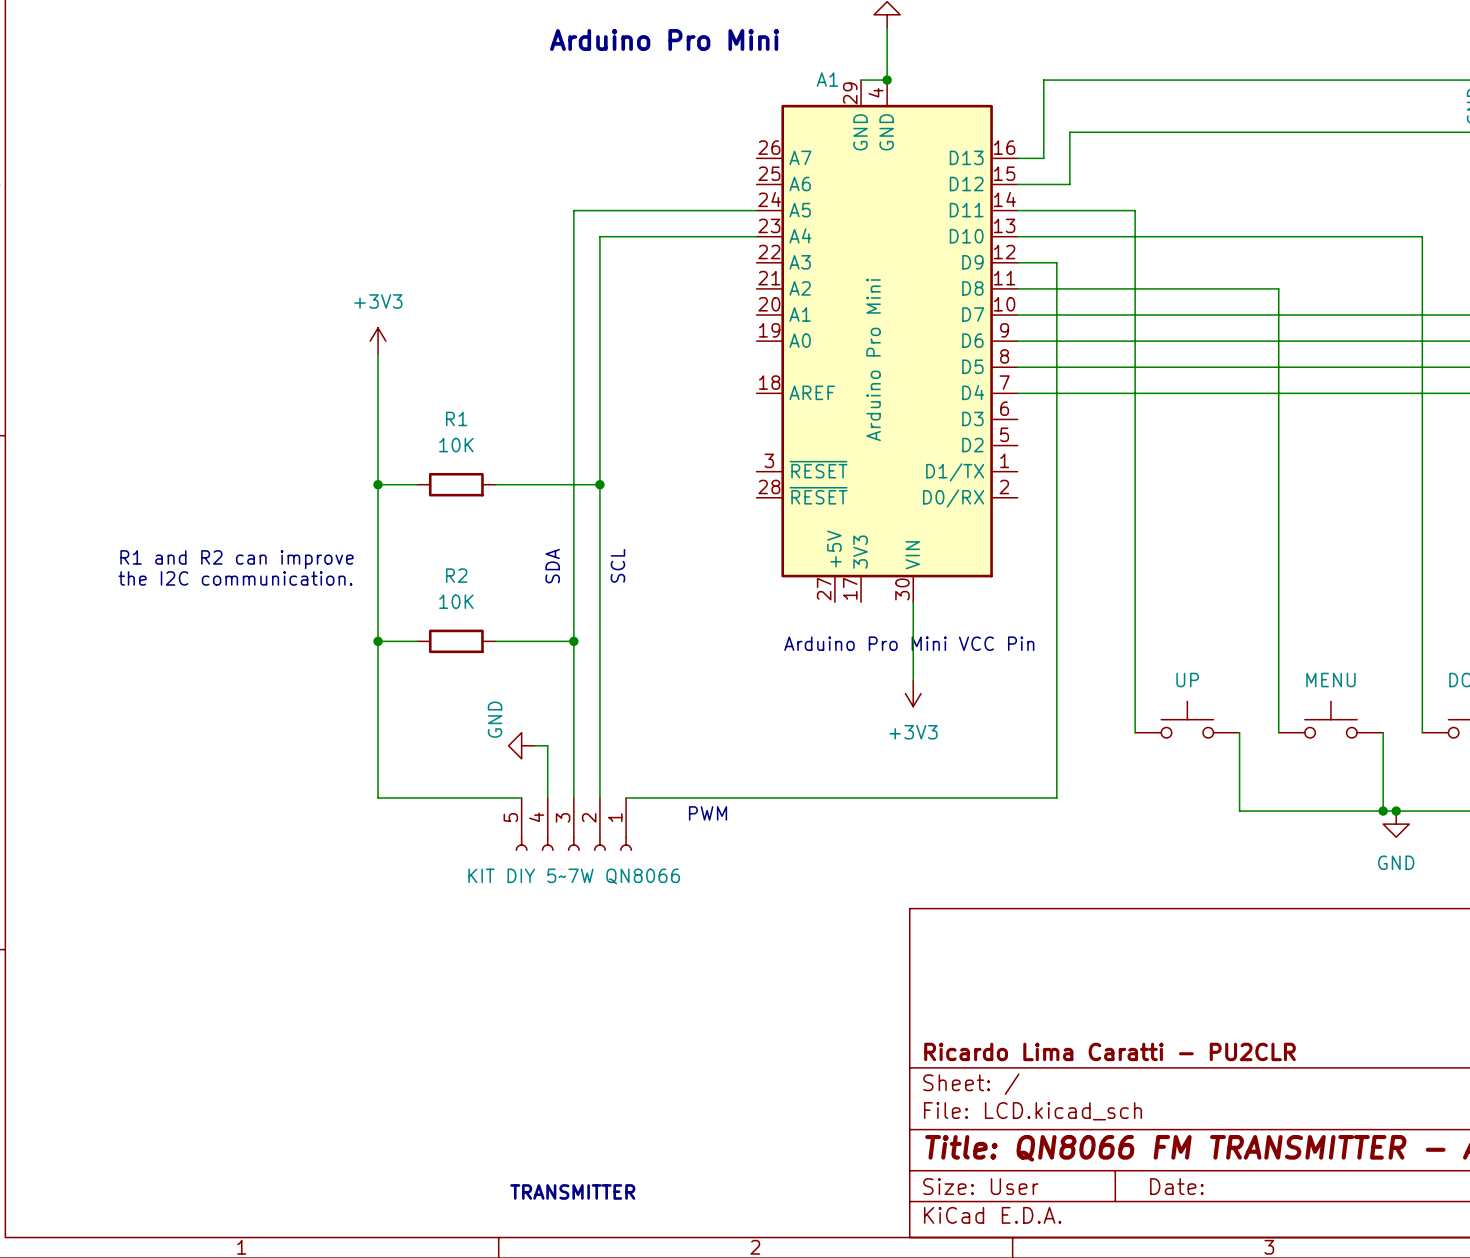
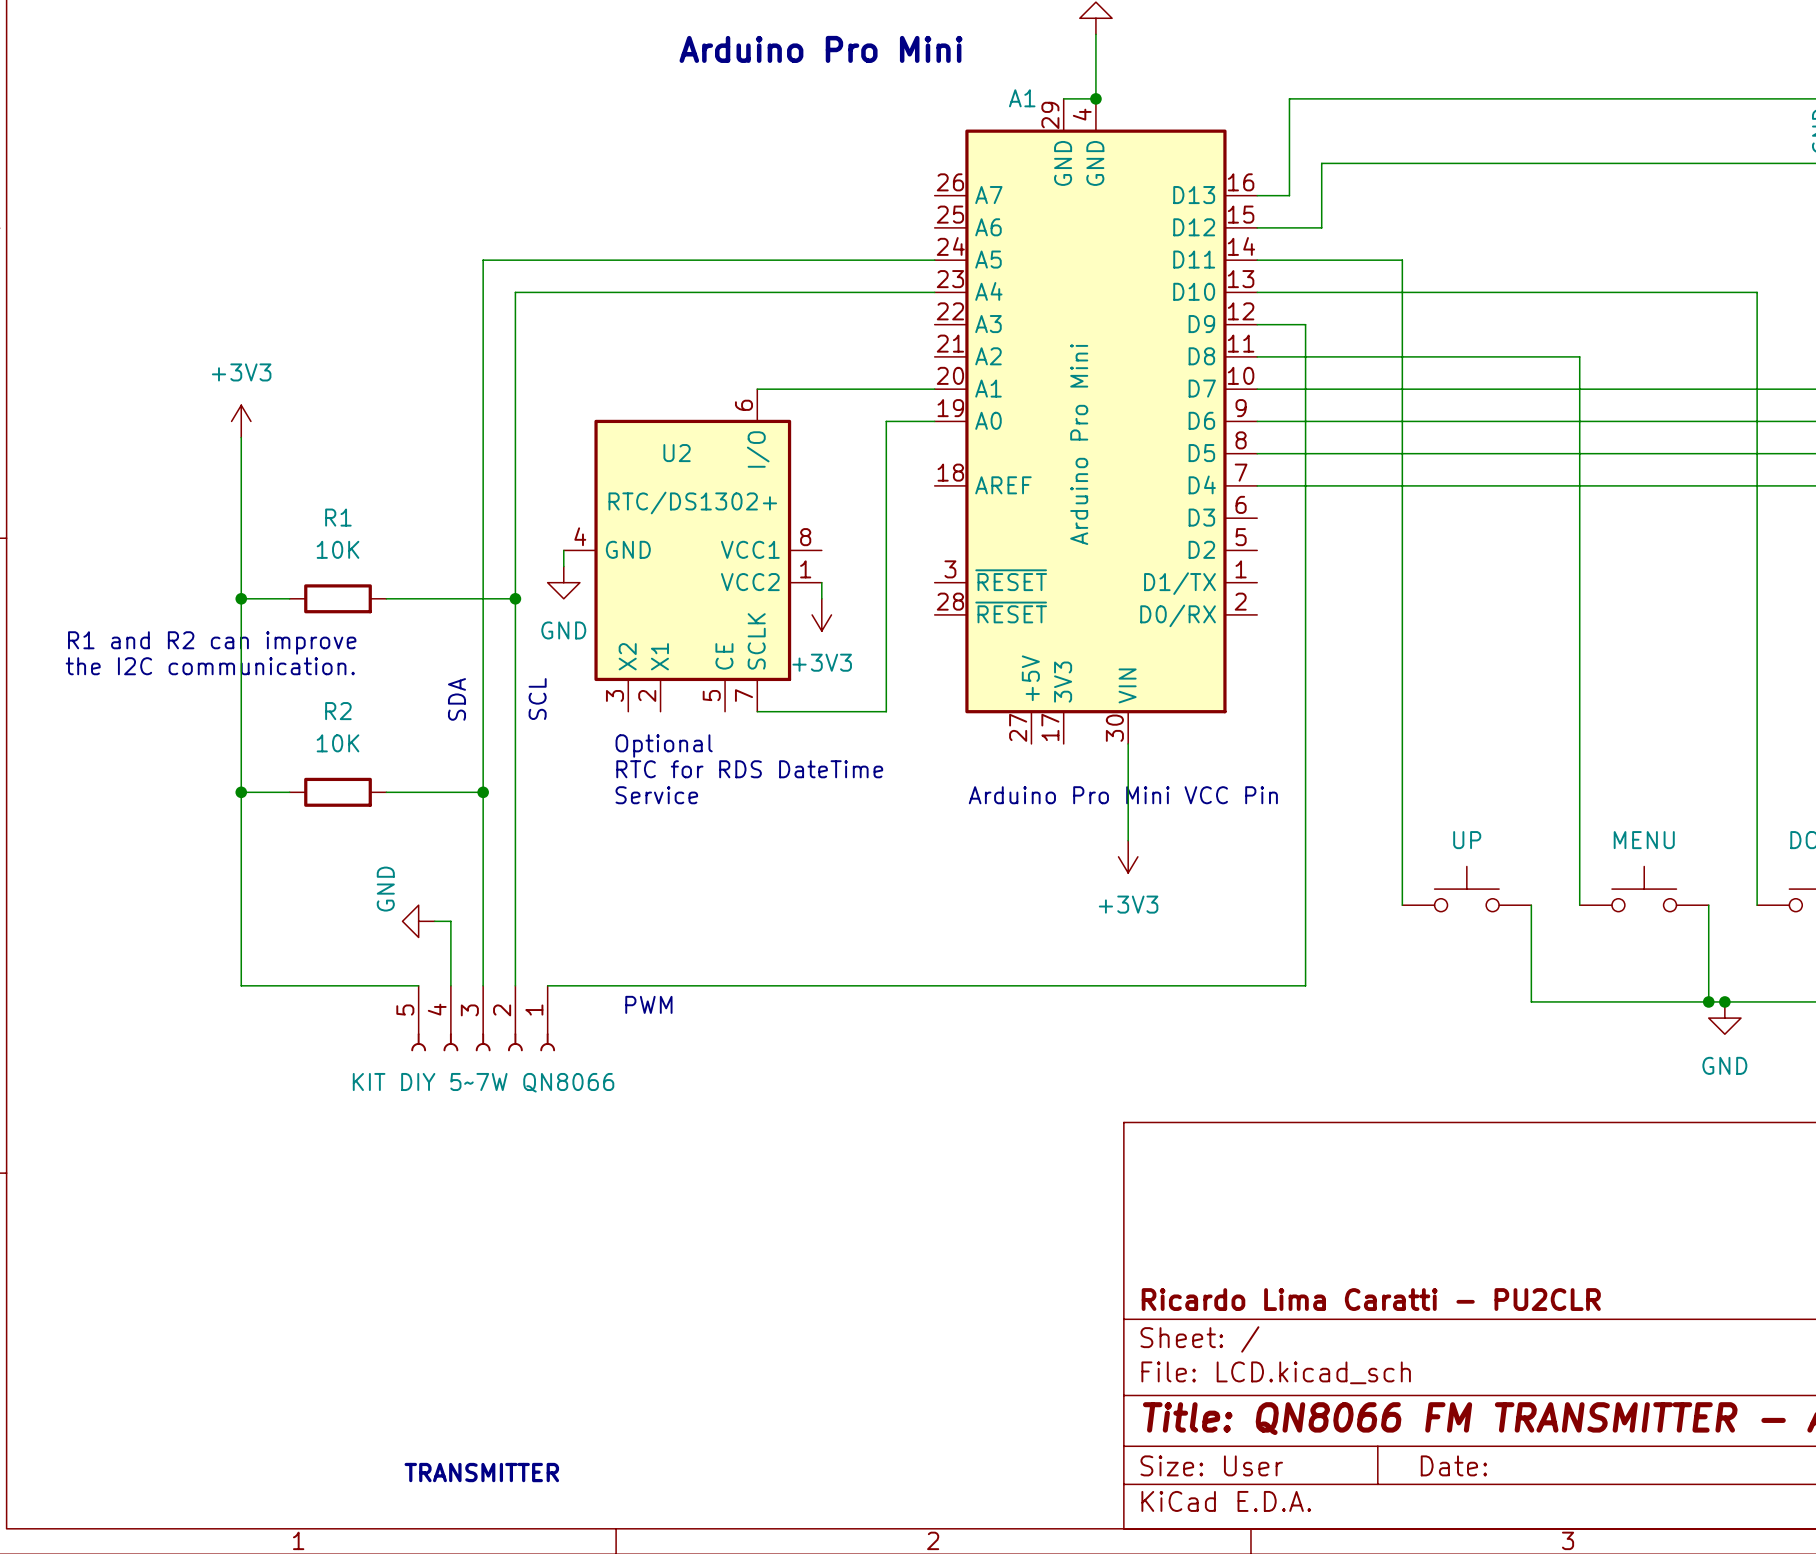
wire: (573, 210) (573, 798) -> (708, 260) (483, 260) (483, 985)
wire: (599, 236) (599, 798) -> (741, 292) (515, 292) (515, 985)
wire: none -> (757, 389) (934, 389)
power symbol: none -> +3V3 (241, 421)
power symbol: +3V3 (378, 341) -> none
wire: none -> (934, 421) (886, 421) (886, 711) (757, 711)
wire: none -> (241, 437) (241, 985) (418, 985)
wire: (378, 354) (378, 798) (443, 798) -> none
wire: none -> (563, 550) (563, 566)
U2: none -> RTC/DS1302+ (692, 550)
power symbol: none -> GND (563, 582)
wire: none -> (821, 582) (821, 598)
wire: none -> (241, 598) (289, 598)
junction: none -> (241, 598)
wire: none -> (386, 598) (467, 598)
junction position: (378, 484) -> (515, 598)
R1 position: (456, 484) -> (338, 598)
junction: (599, 484) -> none
power symbol: none -> +3V3 (821, 614)
text position: R1 and R2 can improve (237, 559) -> R1 and R2 can improve (212, 642)
text position: SCL (617, 565) -> SCL (537, 699)
text position: SDA (552, 566) -> SDA (456, 699)
text position: the I2C communication. (235, 578) -> the I2C communication. (210, 666)
text: none -> Optional (664, 745)
text: none -> RTC for RDS DateTime (749, 769)
wire: none -> (241, 792) (289, 792)
junction: none -> (241, 792)
wire: none -> (386, 792) (467, 792)
junction position: (378, 641) -> (483, 792)
wire: (391, 641) (417, 641) -> none
R2 position: (456, 641) -> (338, 792)
wire: (495, 641) (573, 641) -> none
junction: (573, 641) -> none
text: none -> Service (656, 795)
power symbol: none -> GND (418, 921)
power symbol: GND (521, 745) -> none
wire: (534, 745) (547, 745) (547, 798) -> (434, 921) (450, 921) (450, 985)
wire: none -> (644, 985) (773, 985)
text position: PWM (708, 813) -> PWM (648, 1004)
part position: (573, 824) -> (483, 1018)
text position: TRANSMITTER (572, 1191) -> TRANSMITTER (481, 1472)

